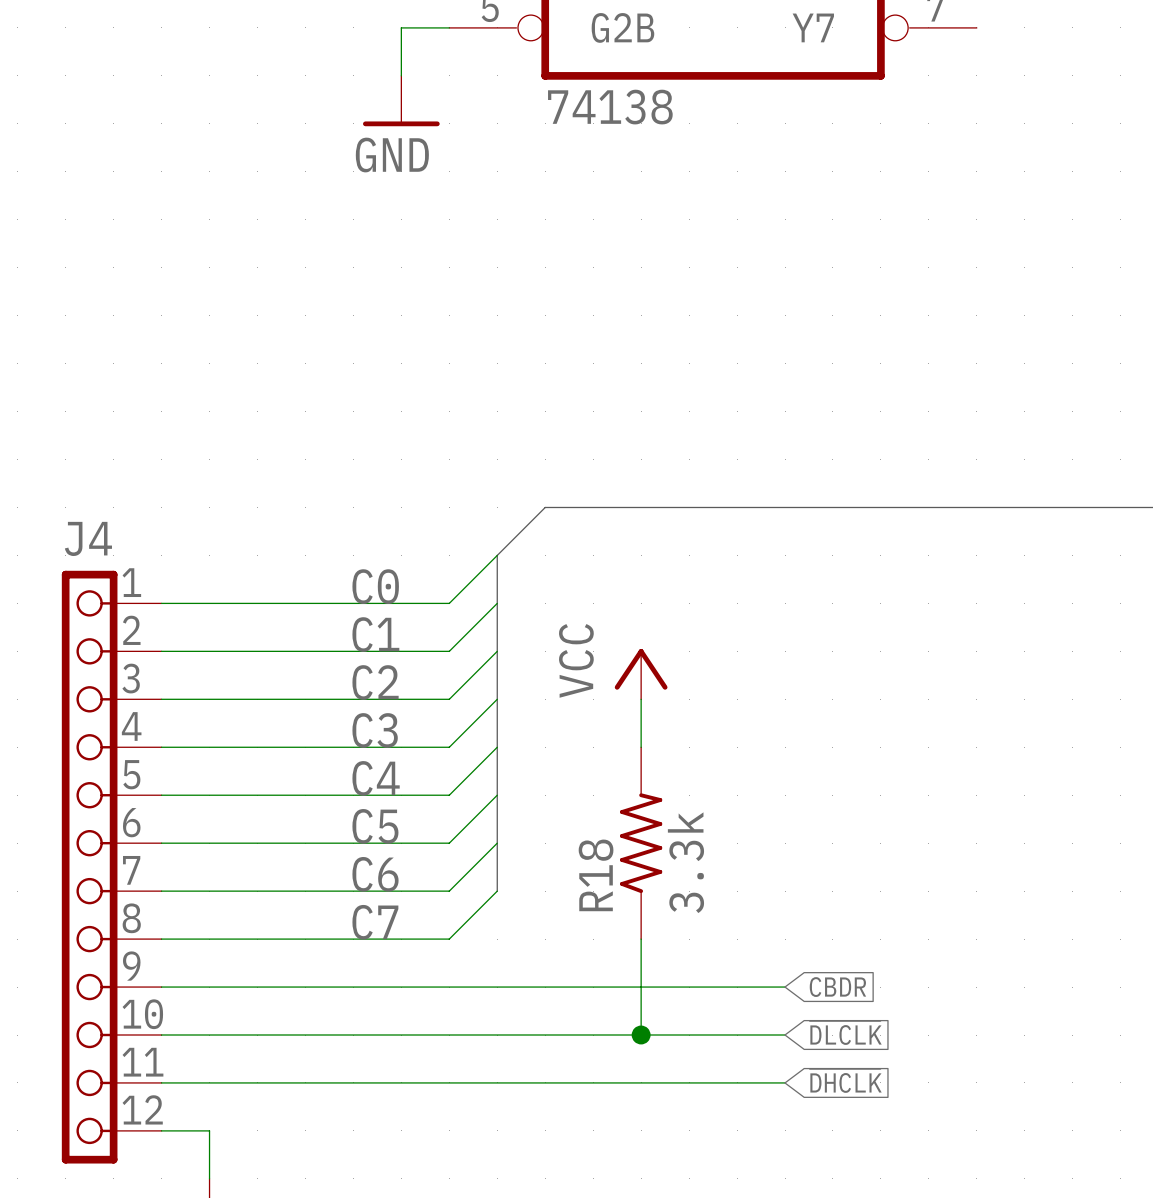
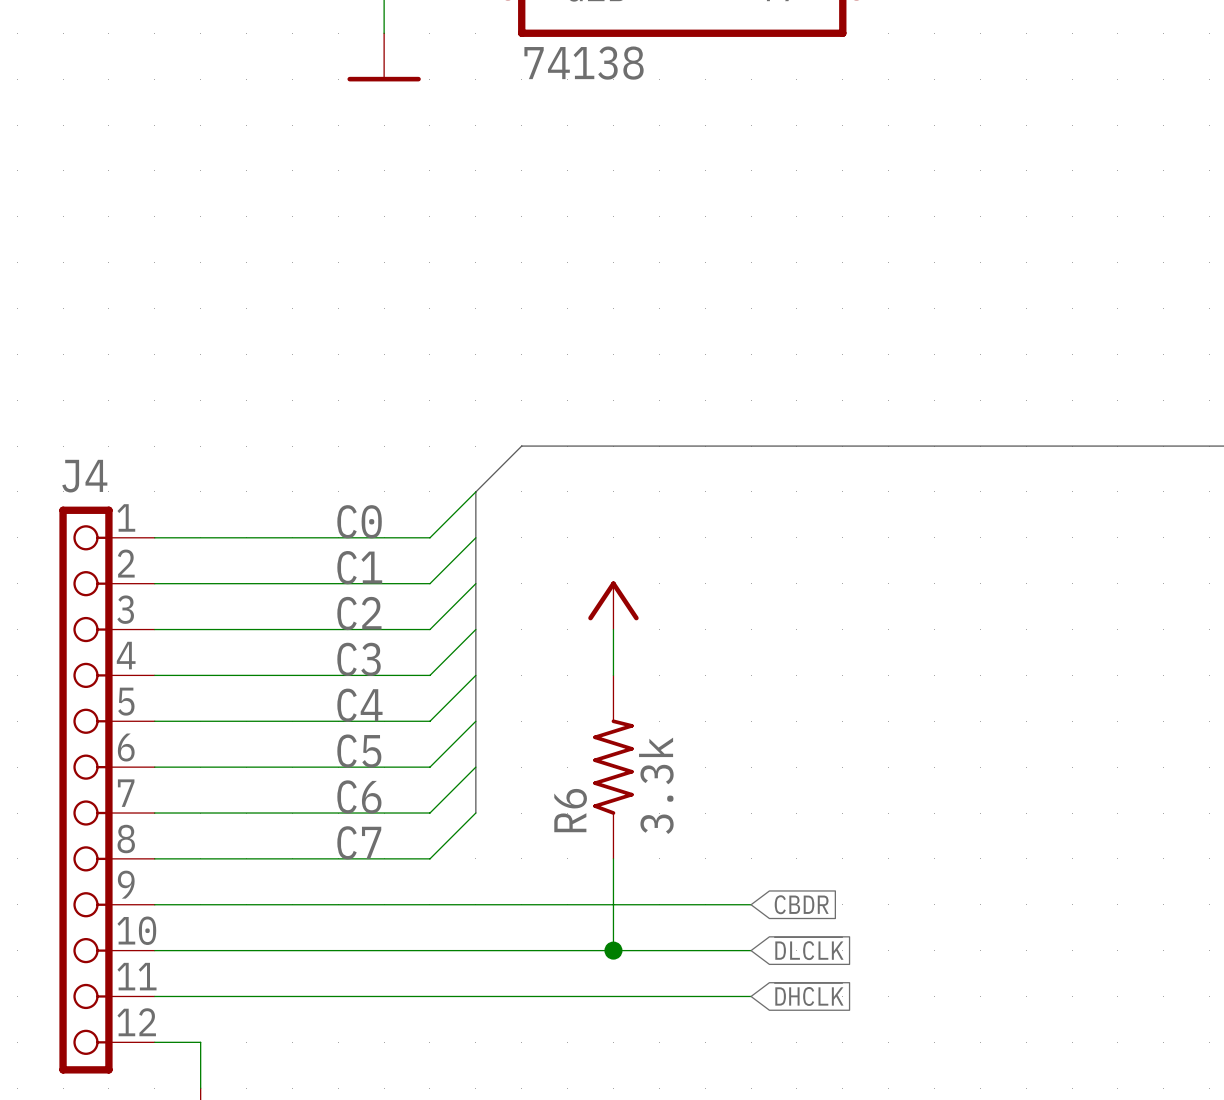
power symbol text: GND (392, 155) -> none
power symbol text: VCC (576, 660) -> none
R18 name: R18 (596, 875) -> R6 (570, 810)

